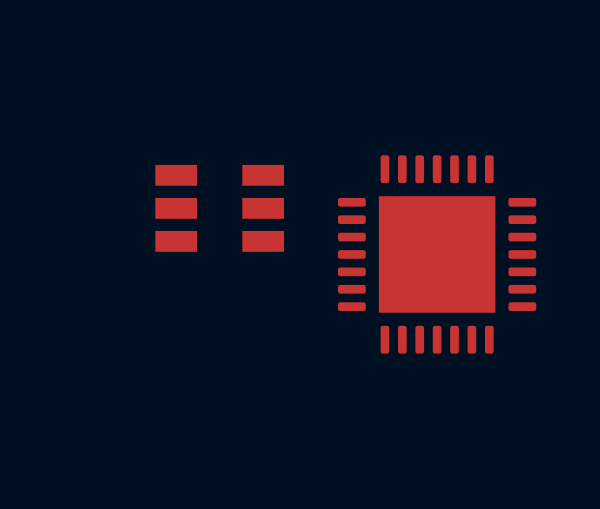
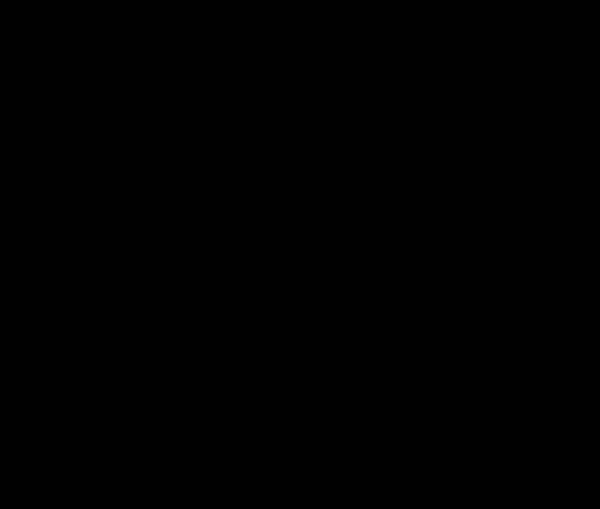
part: (219, 208) -> none
part: (437, 254) -> none

